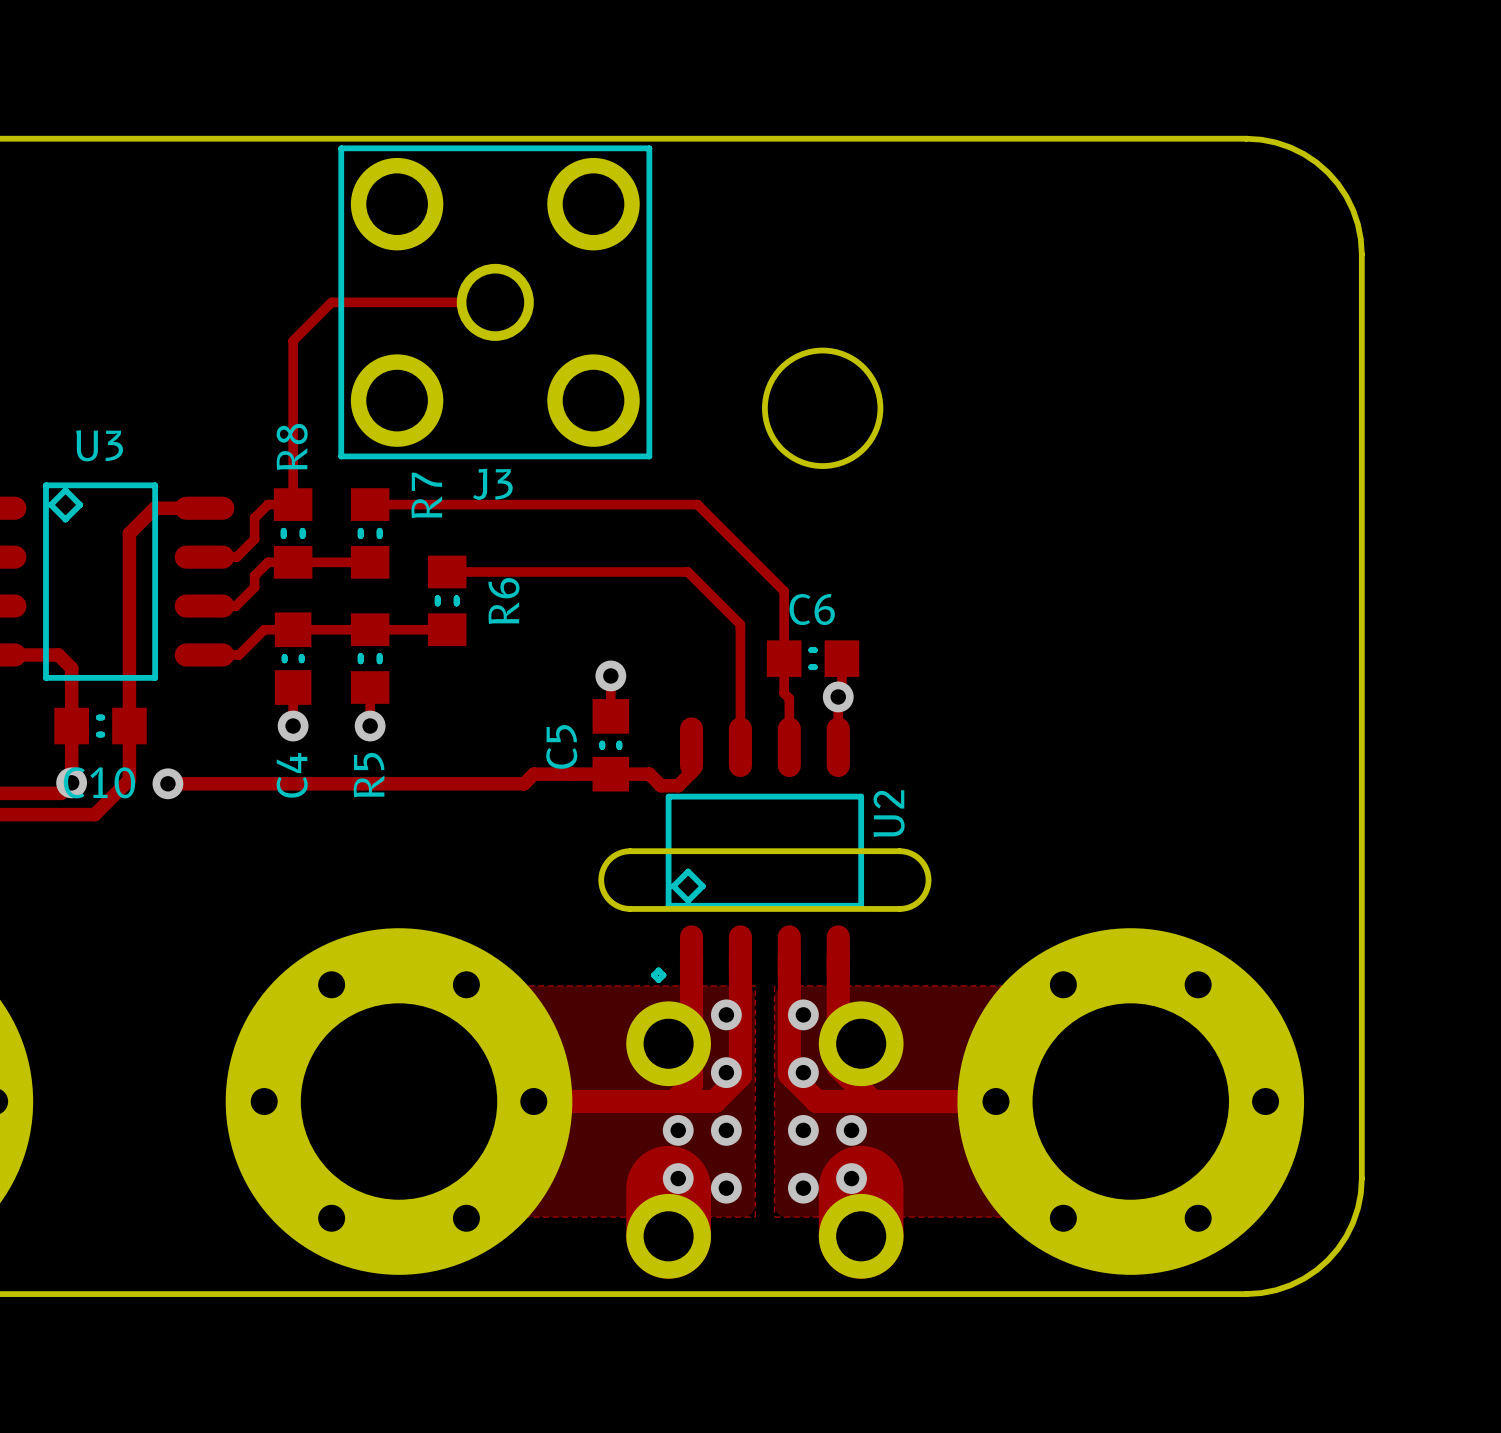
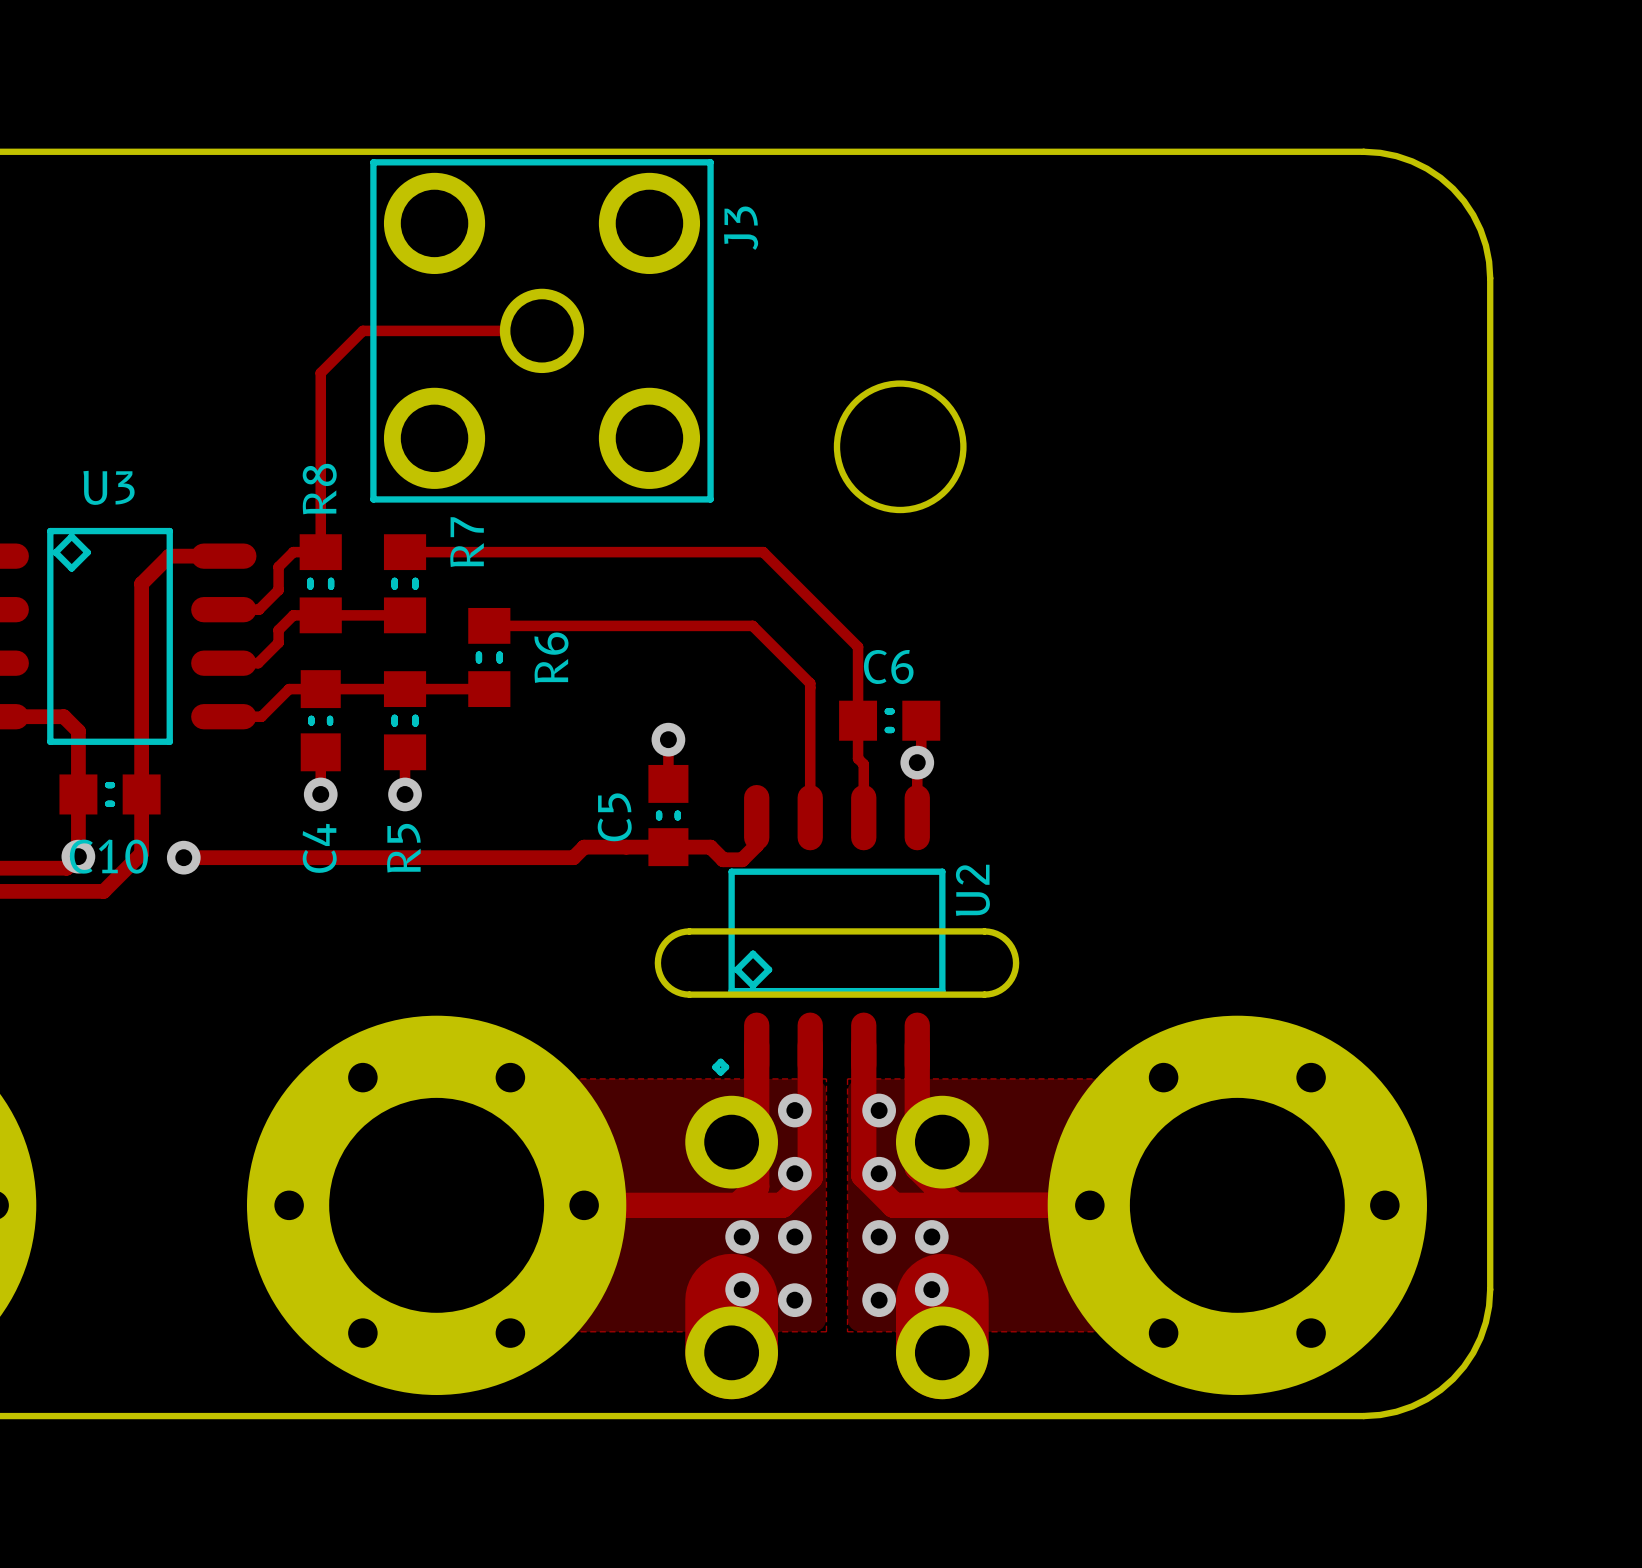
J3 name rotation: 0° (492, 484) -> 90° counterclockwise (741, 228)
J3 name position: J3 (492, 484) -> J3 (741, 228)

